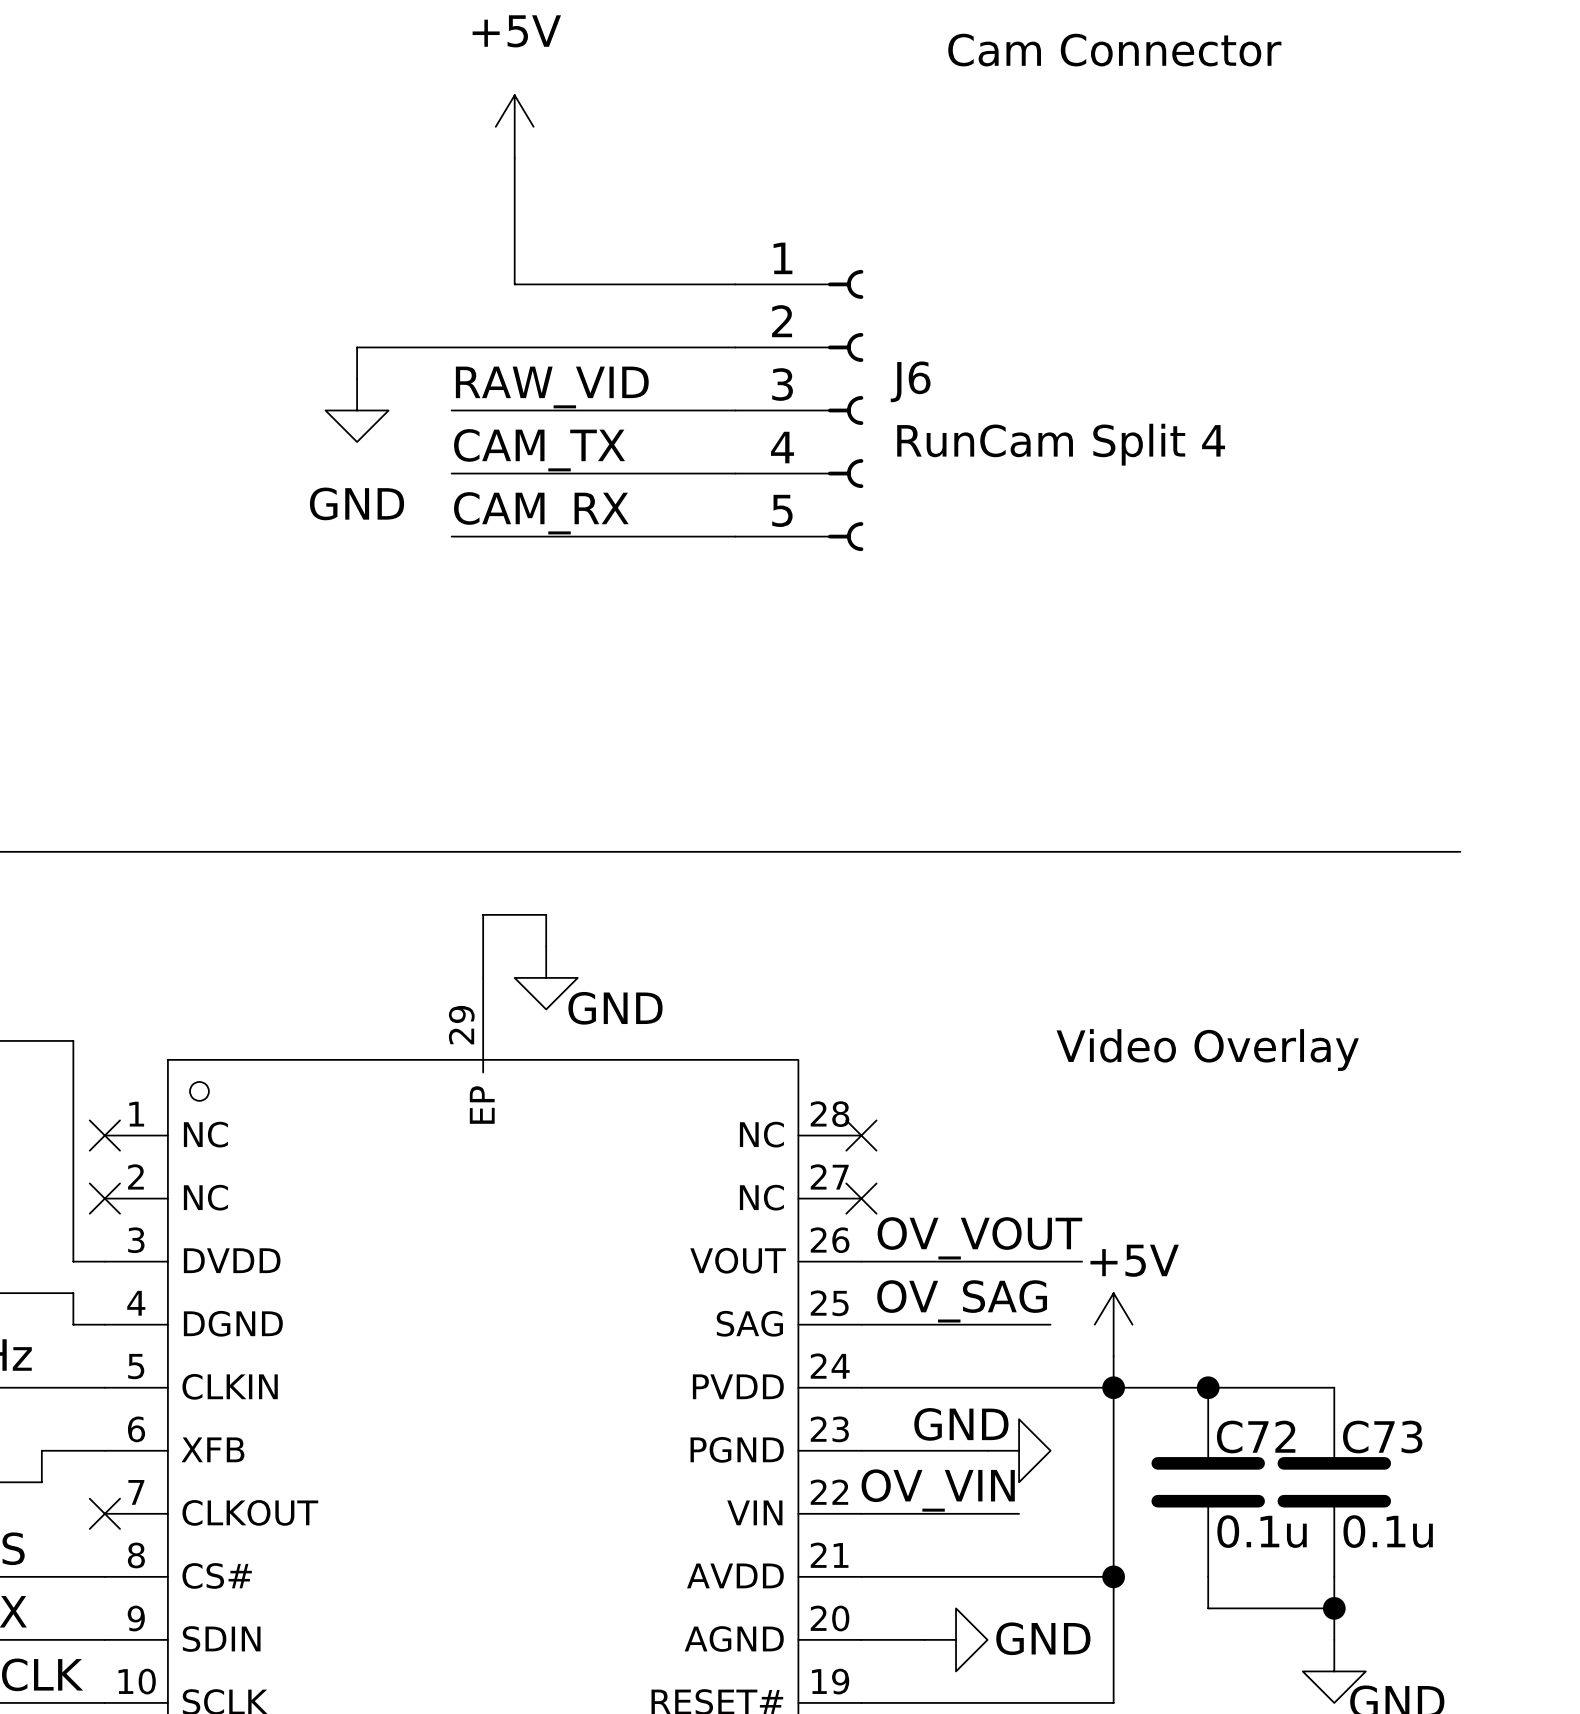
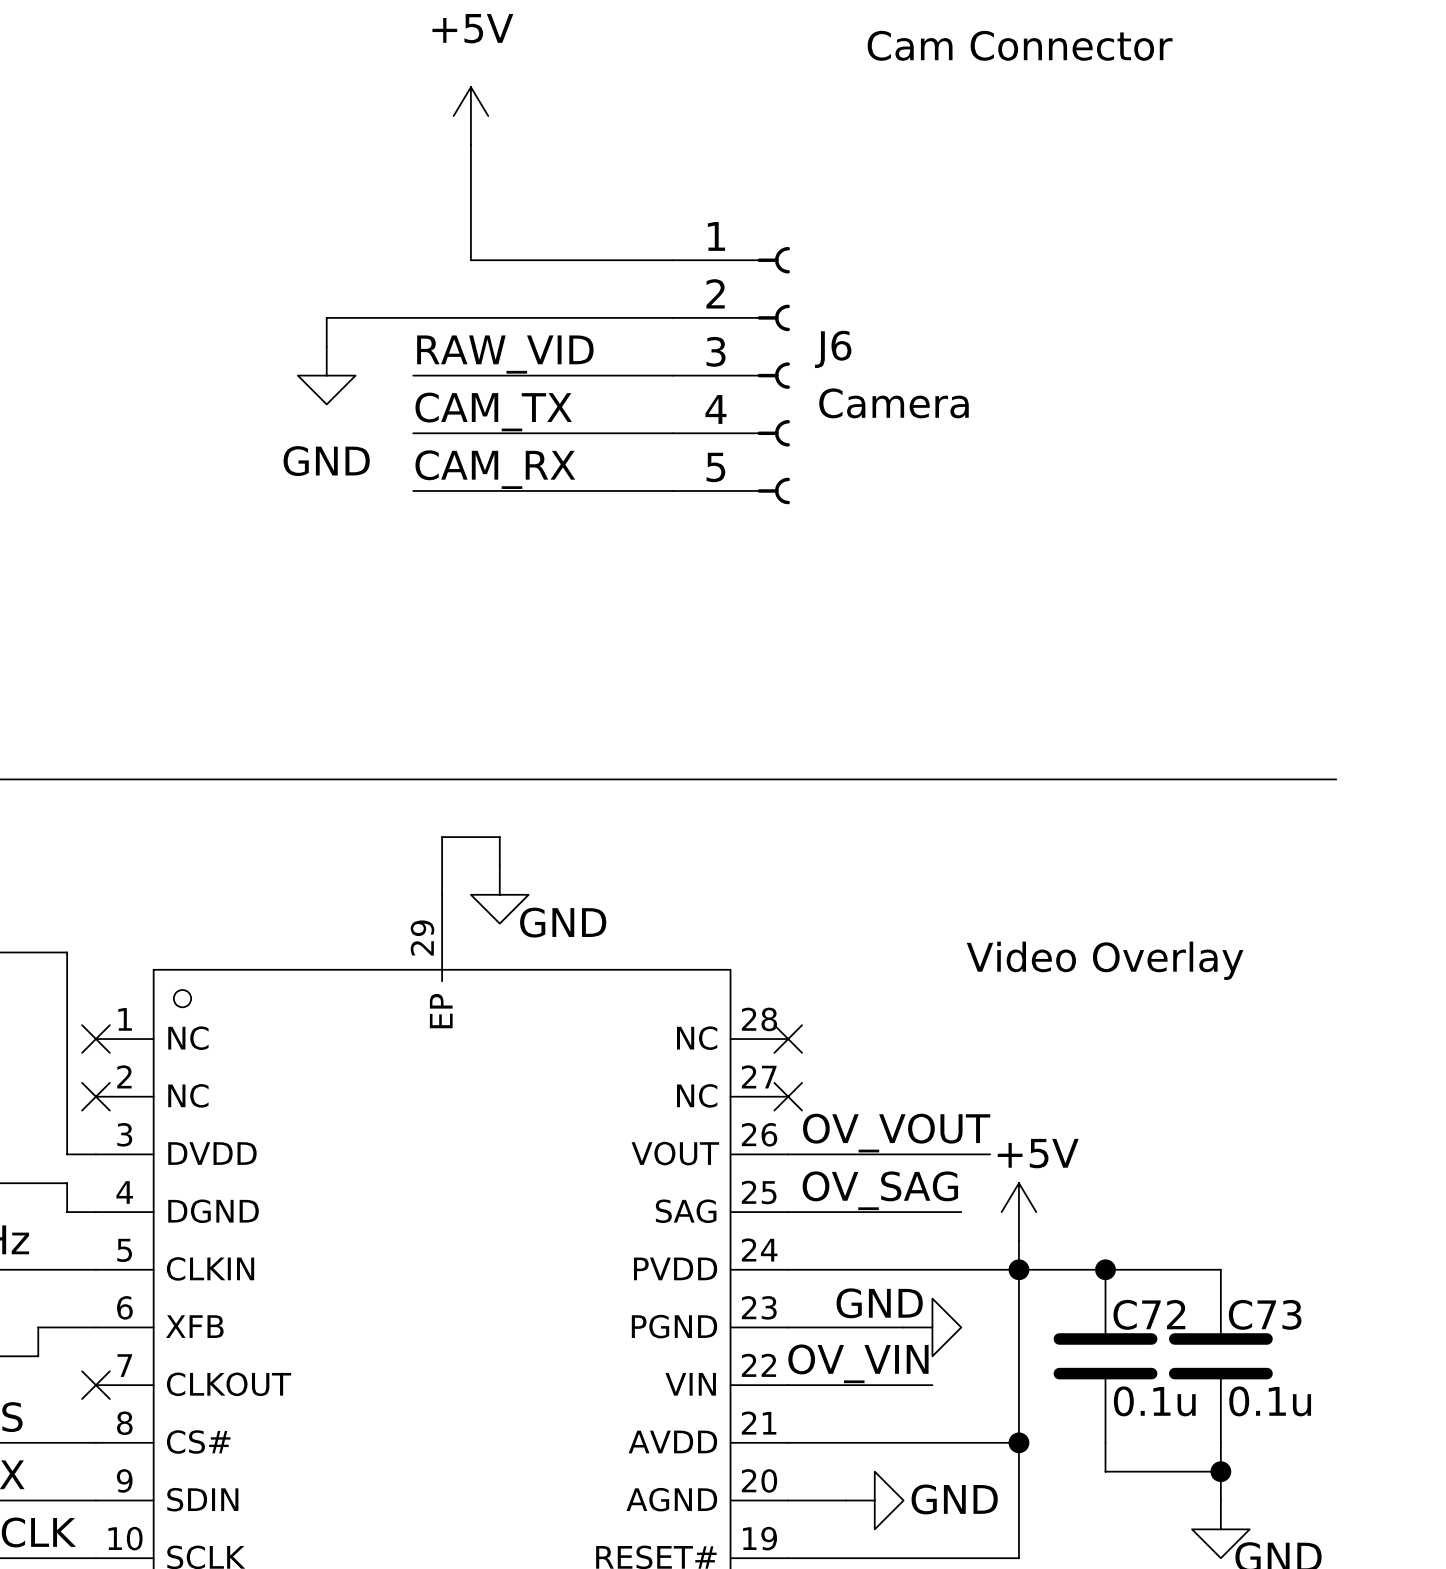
J6 value: RunCam Split 4 (1061, 444) -> Camera (894, 403)

